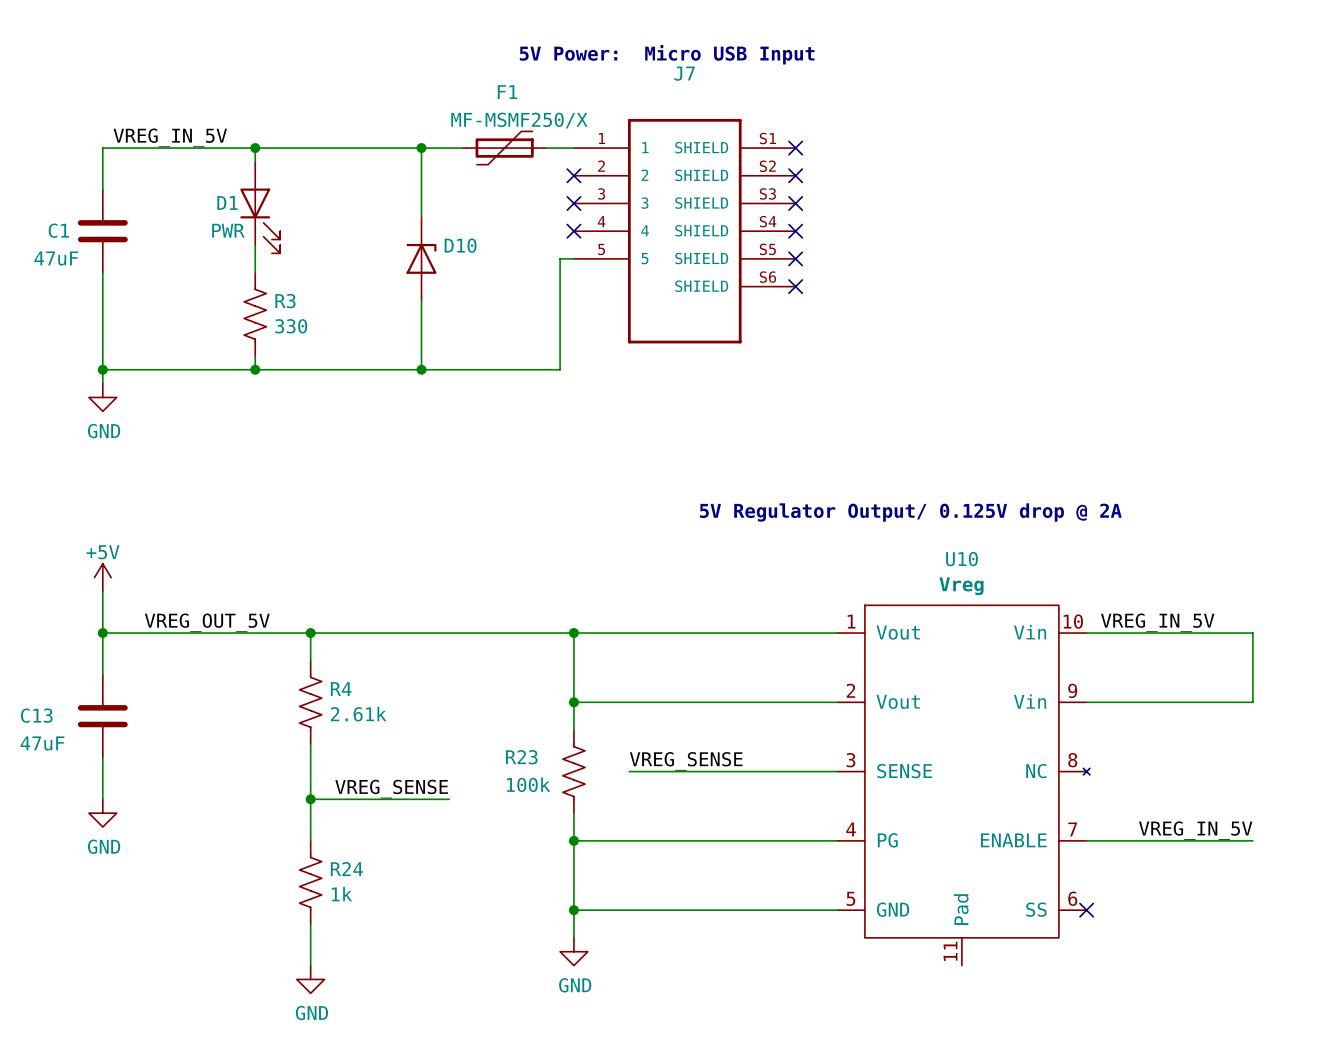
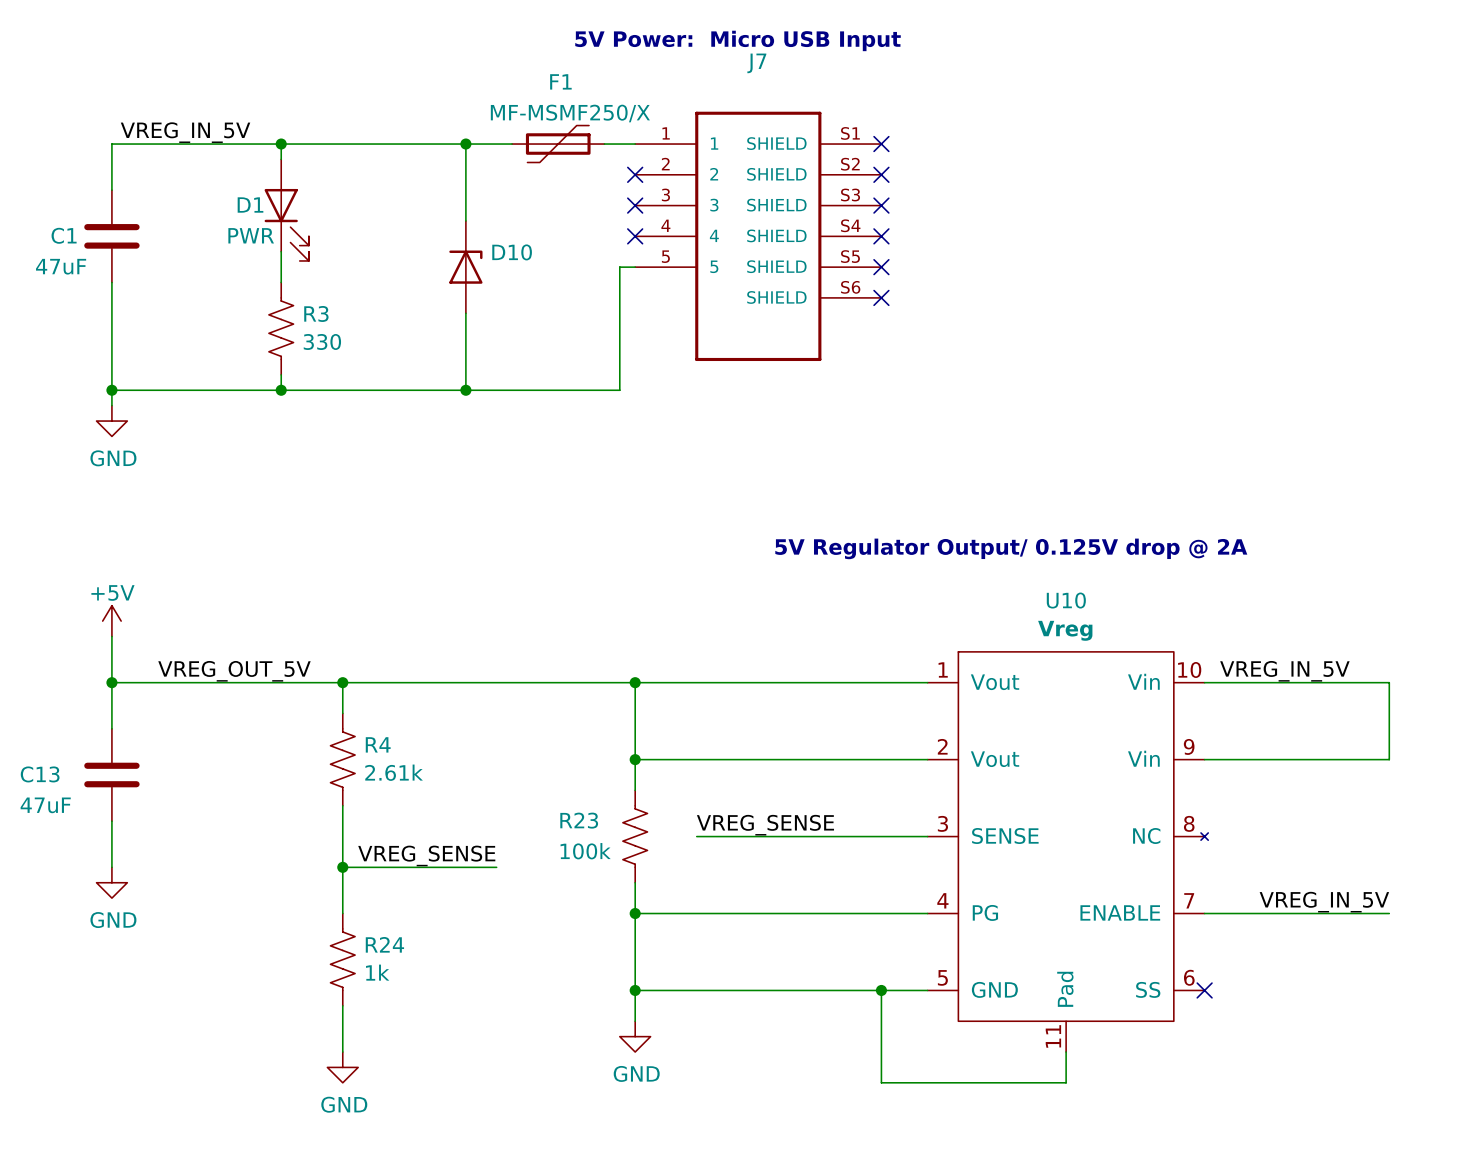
wire: none -> (881, 990) (881, 1082) (1066, 1082) (1066, 1052)
junction: none -> (881, 990)

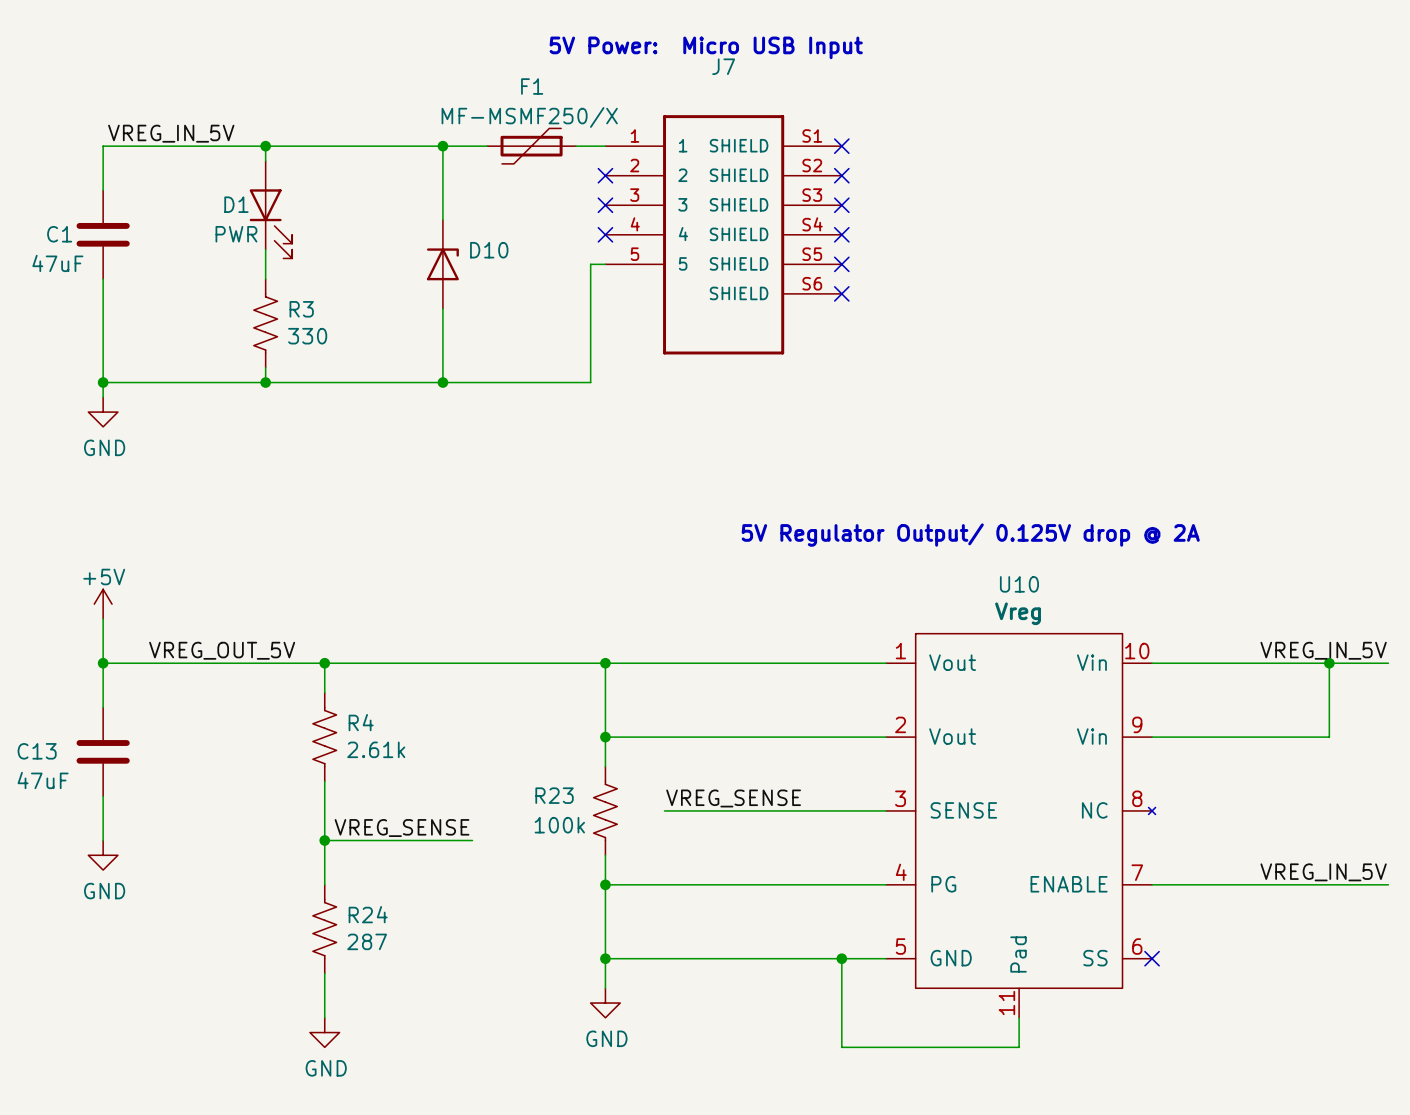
label position: VREG_IN_5V (1284, 671) -> VREG_IN_5V (1323, 650)
wire: none -> (1329, 663) (1388, 663)
junction: none -> (1329, 663)
label position: VREG_IN_5V (1324, 902) -> VREG_IN_5V (1323, 872)
wire: none -> (1329, 884) (1388, 884)
R24 value: 1k (377, 972) -> 287 (367, 941)

